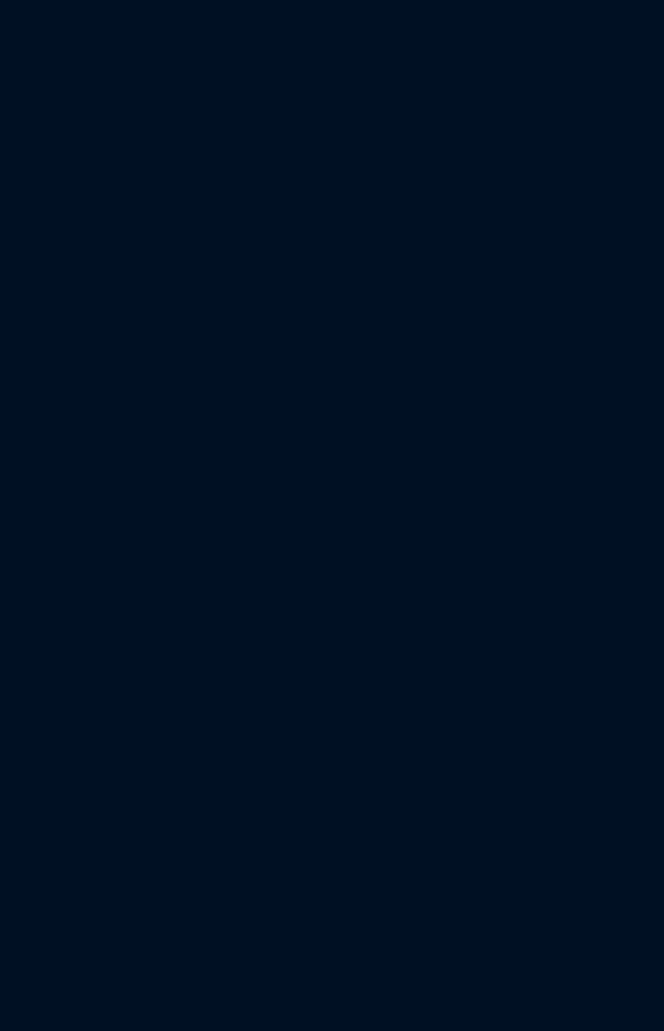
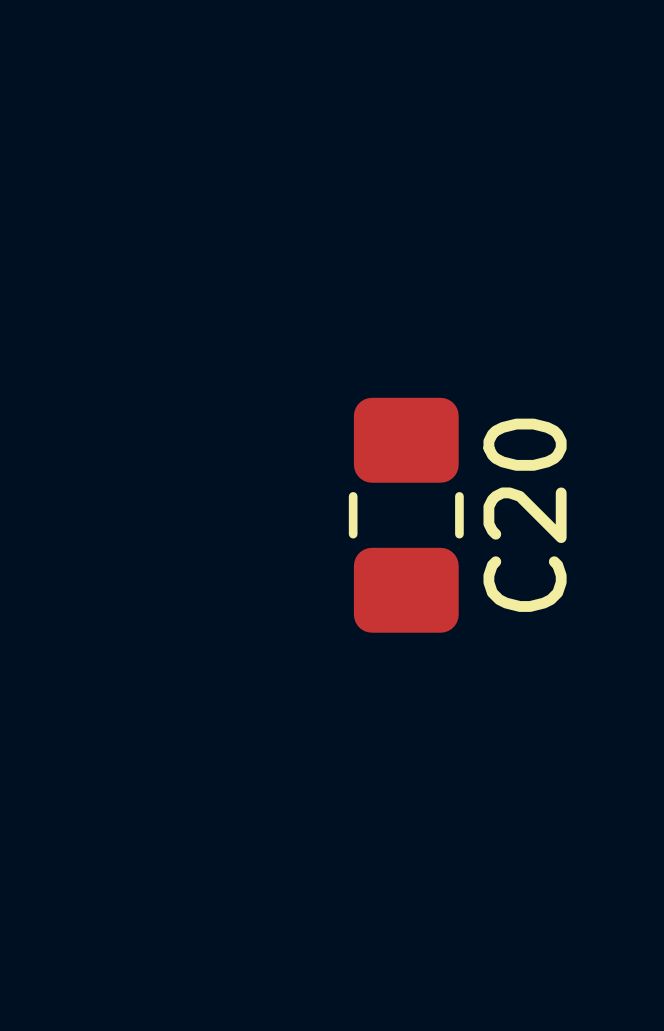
C20: none -> (406, 515)

